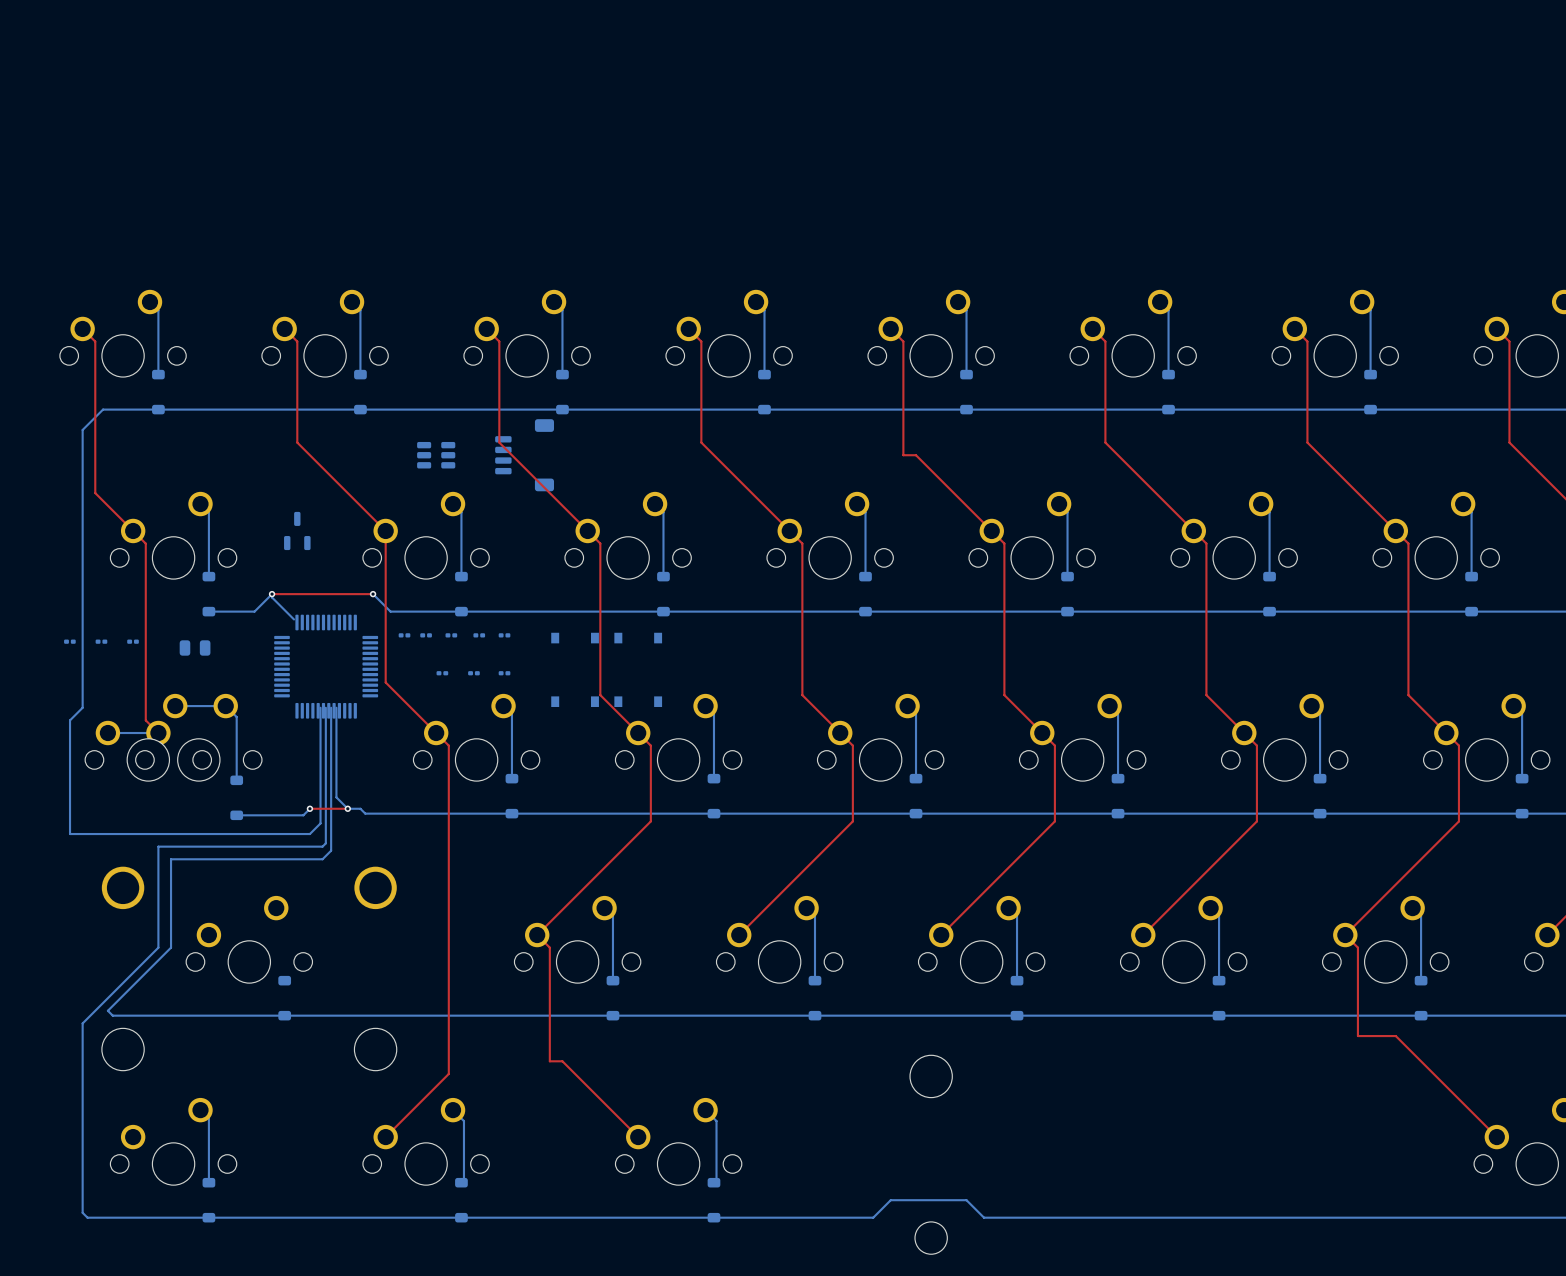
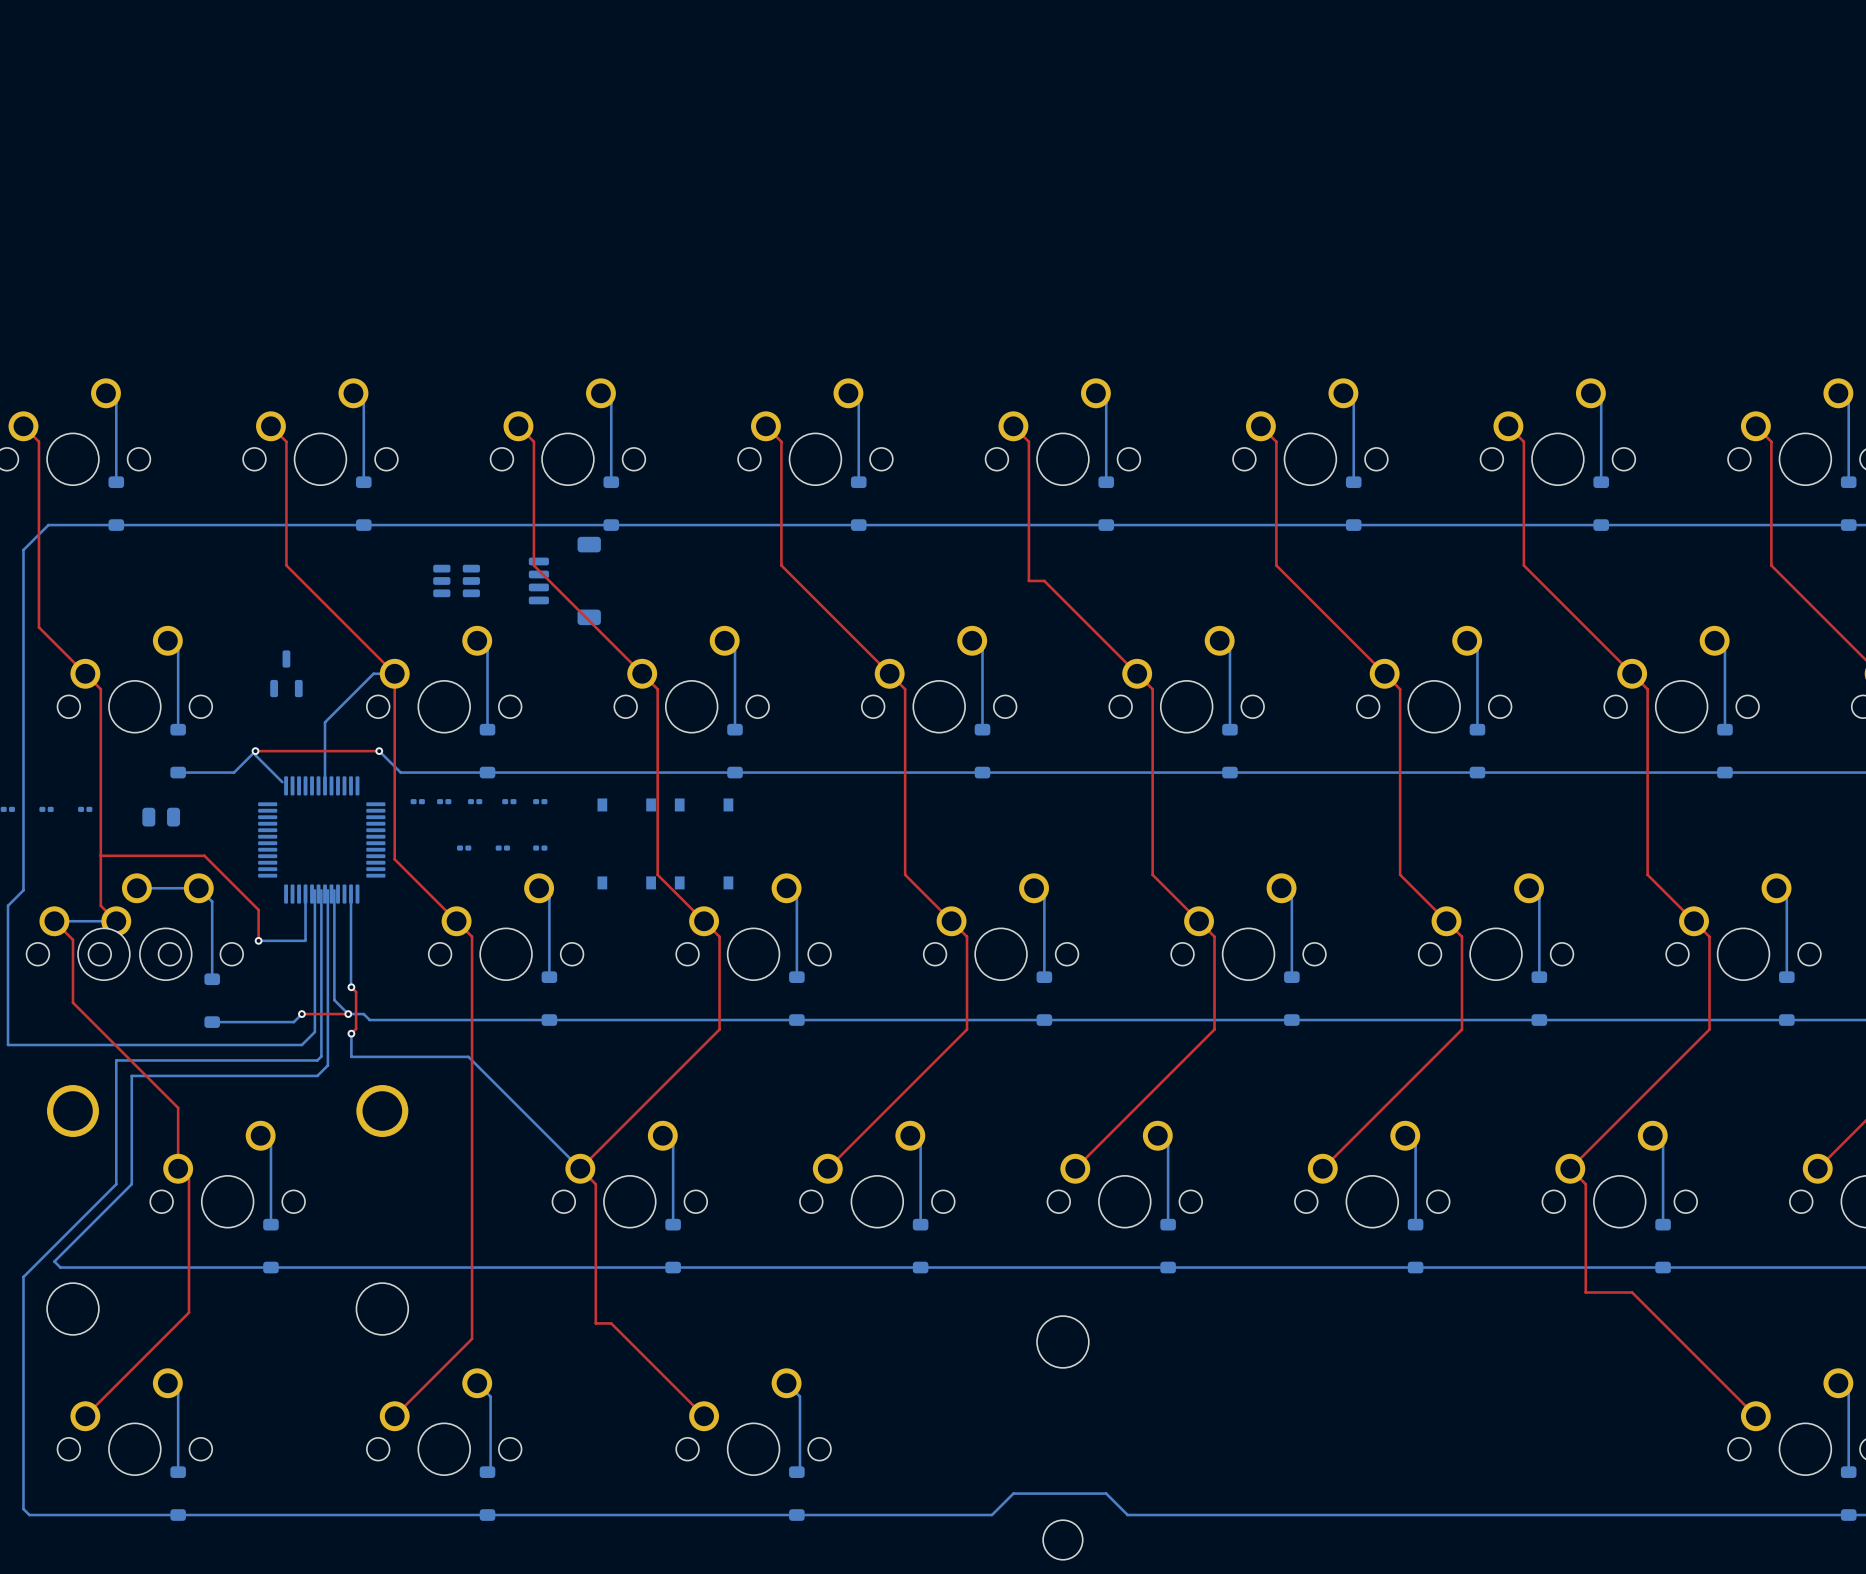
bottom track: none -> (394, 673) (373, 673) (325, 722) (325, 785)
top track: none -> (100, 855) (204, 855) (258, 909) (258, 940)
bottom track: none -> (305, 894) (305, 940) (258, 940)
bottom track: none -> (351, 894) (351, 987)
top track: none -> (54, 921) (72, 939) (72, 1002) (178, 1107) (178, 1168) (188, 1179) (188, 1312) (85, 1416)
via: none -> (258, 940)
top track: none -> (351, 987) (356, 991) (356, 1028) (351, 1033)
via: none -> (351, 987)
bottom track: none -> (351, 1033) (351, 1056) (468, 1056) (580, 1168)
via: none -> (351, 1033)
bottom track: none -> (260, 1135) (270, 1146) (270, 1224)

